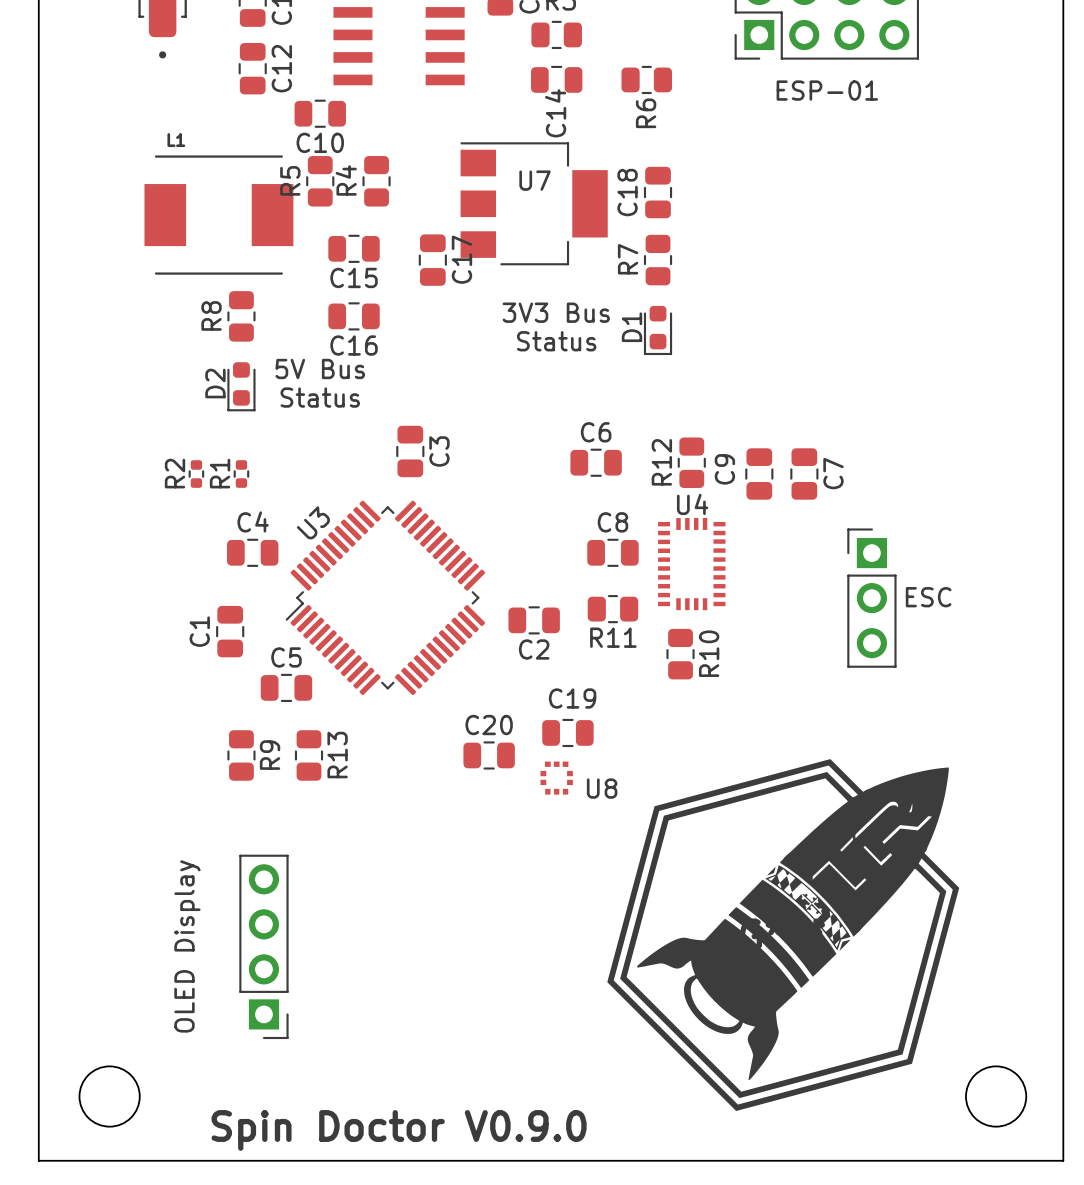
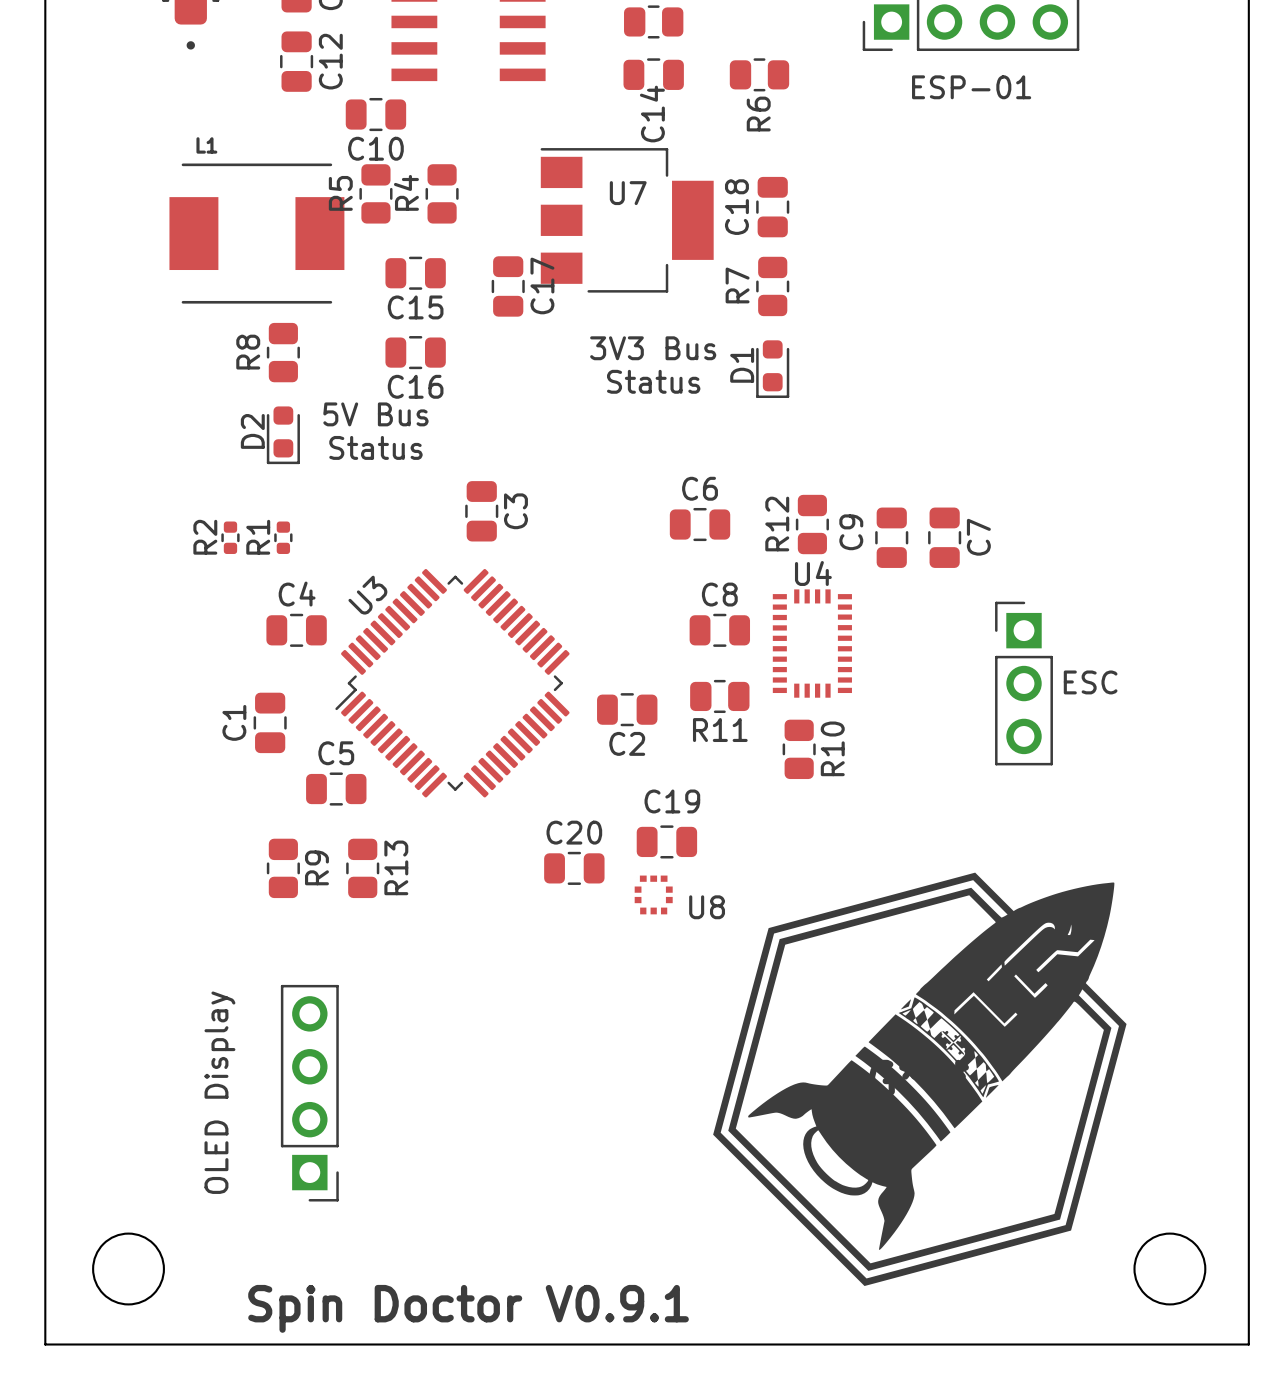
text: Spin Doctor V0.9.0 (399, 1130) -> Spin Doctor V0.9.1 (468, 1308)

